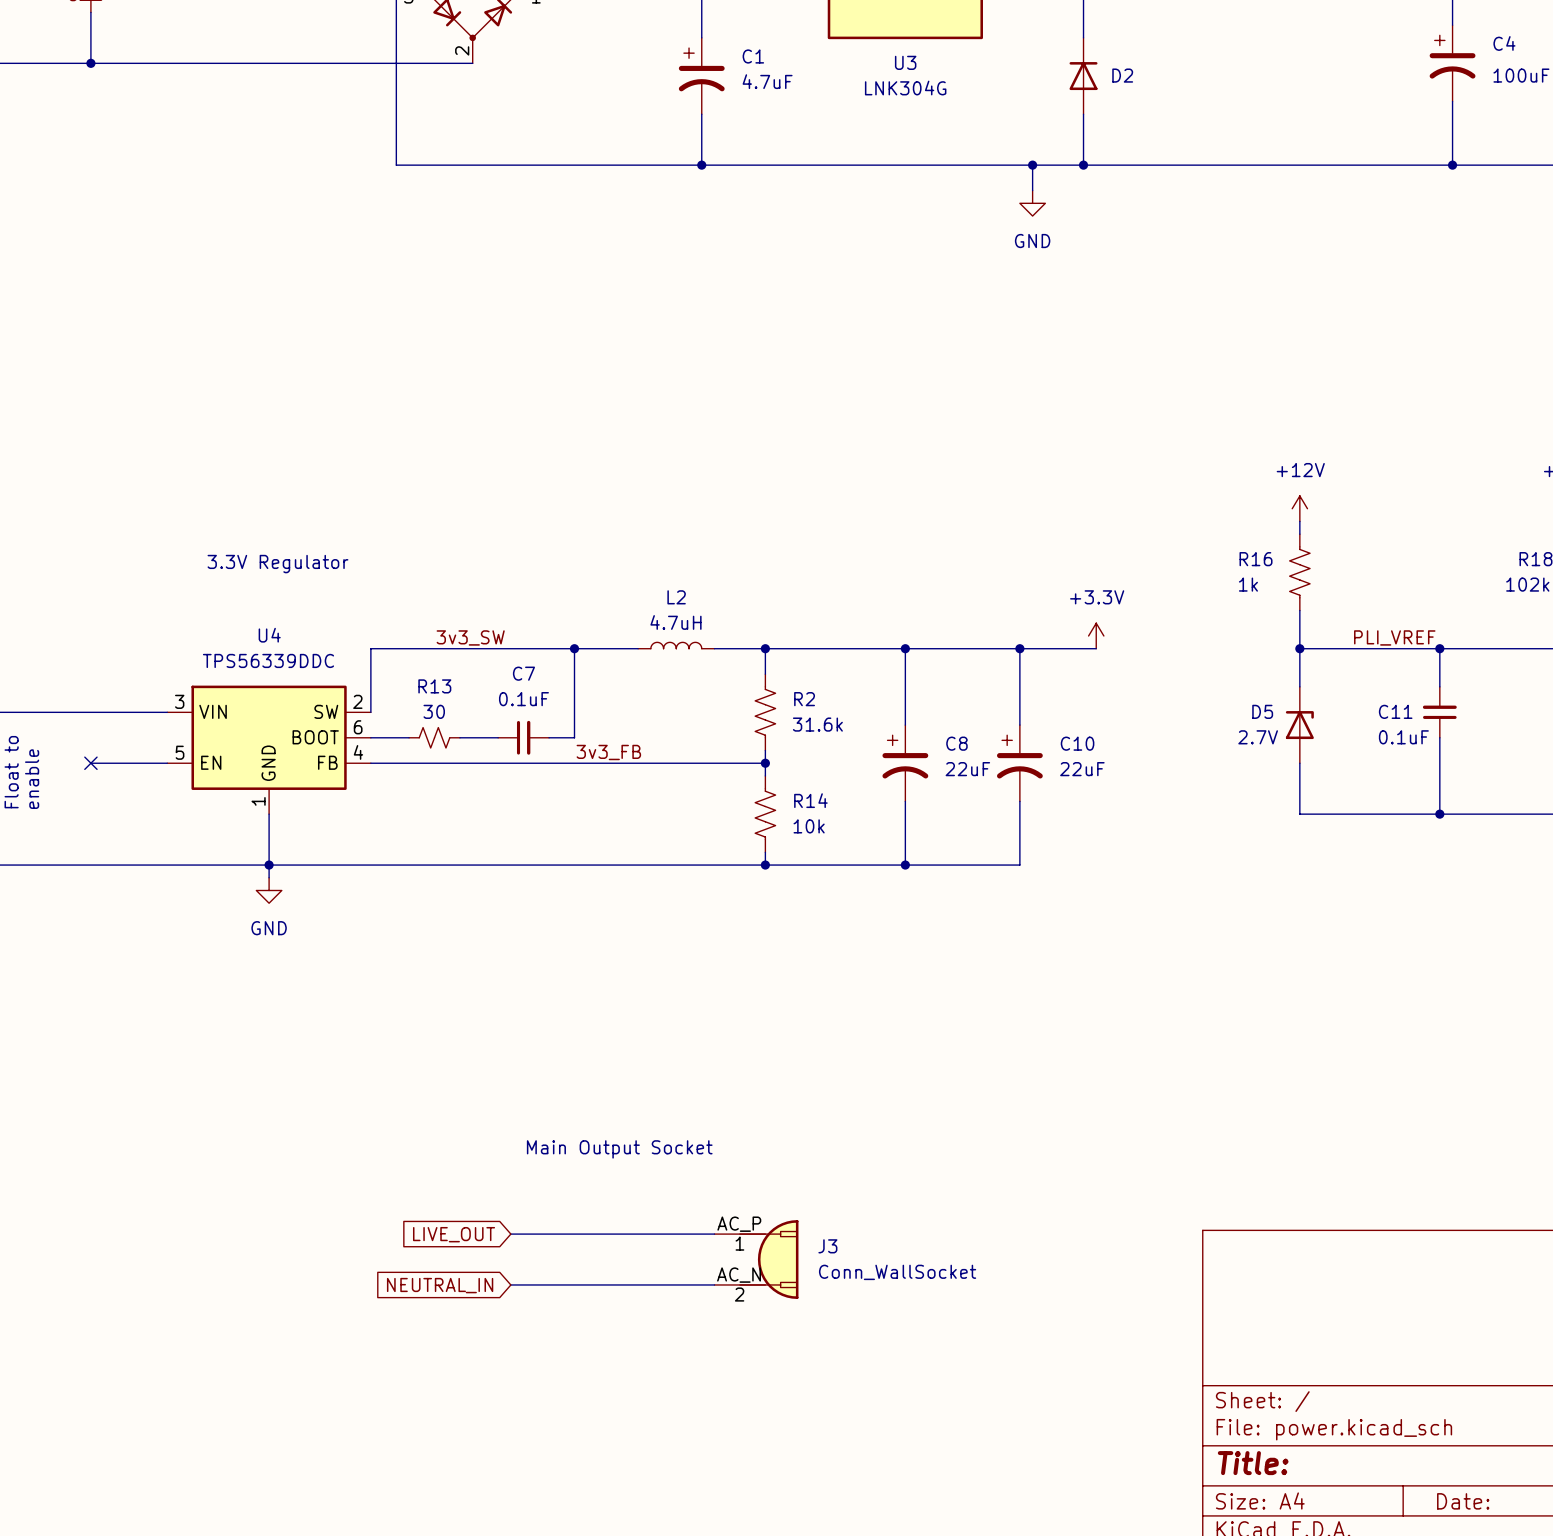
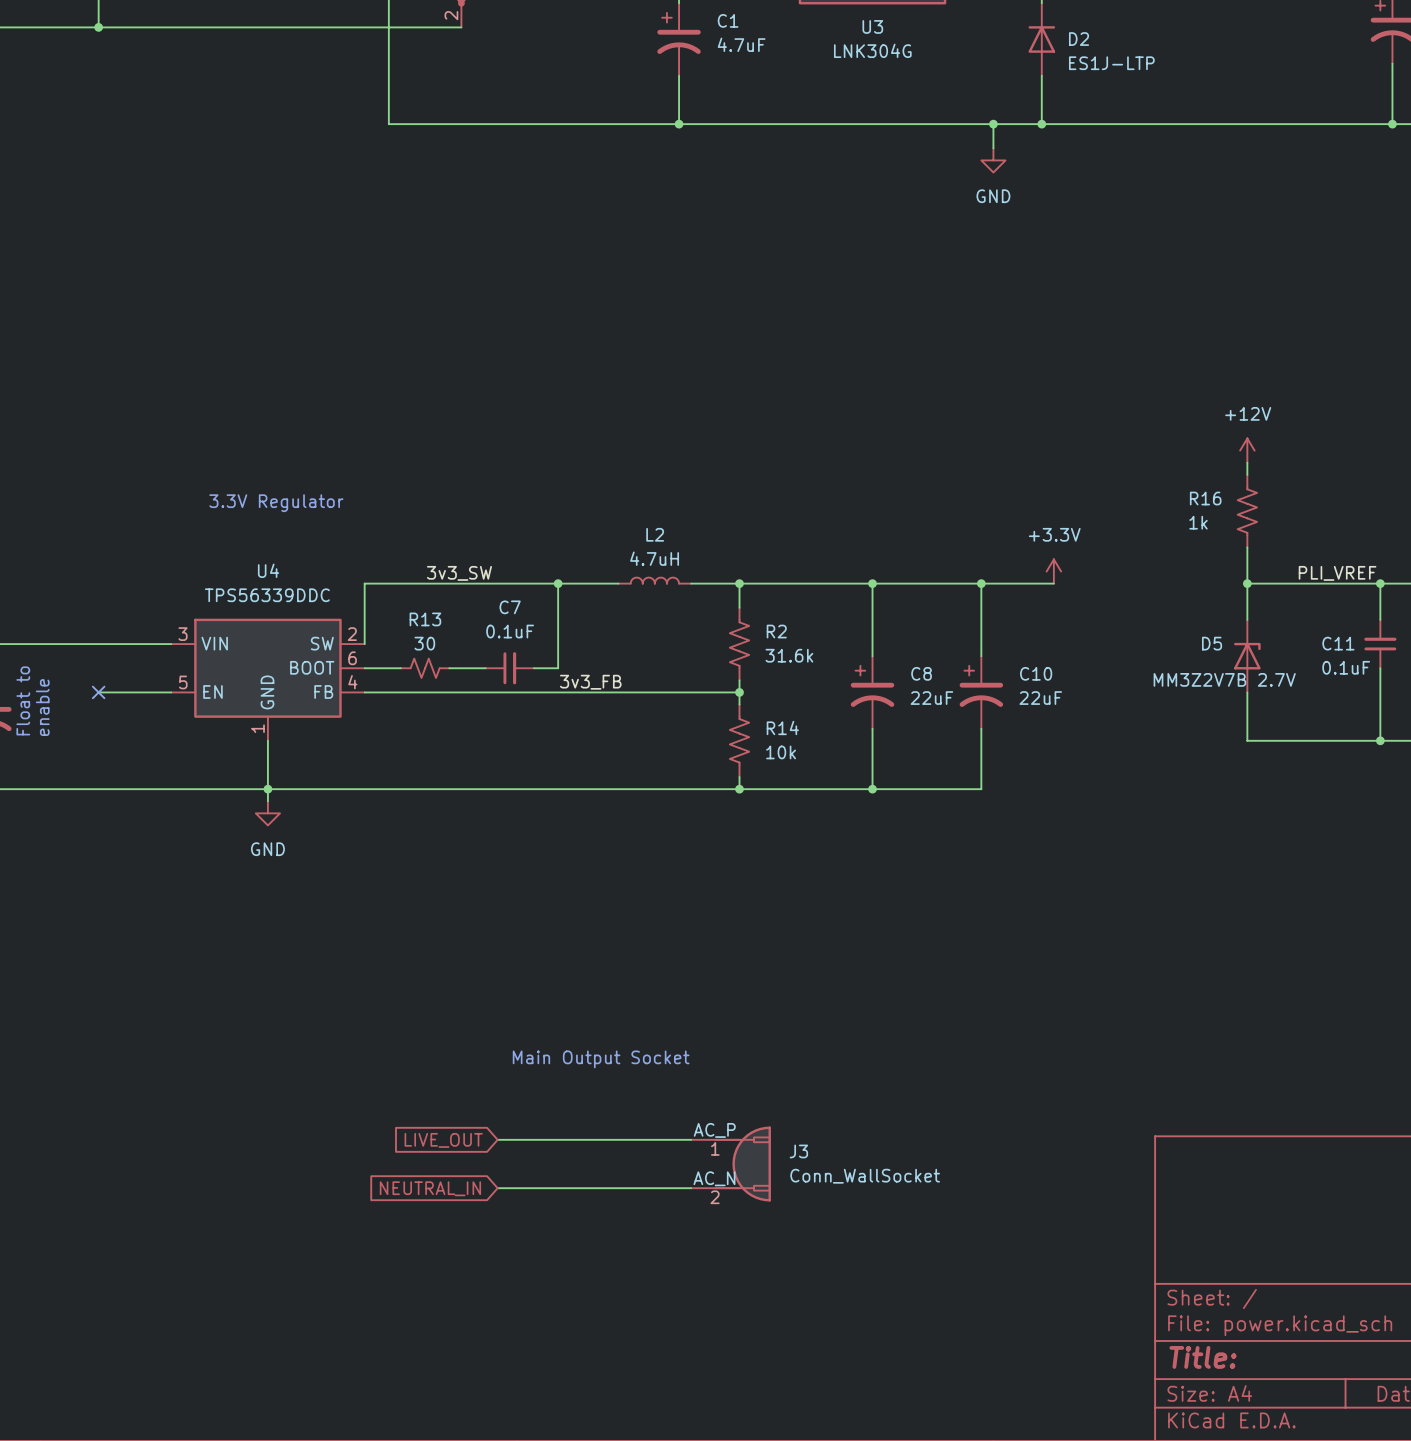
D2 value: none -> ES1J-LTP (1111, 63)
D5 value: 2.7V (1258, 737) -> MM3Z2V7B 2.7V (1224, 679)

